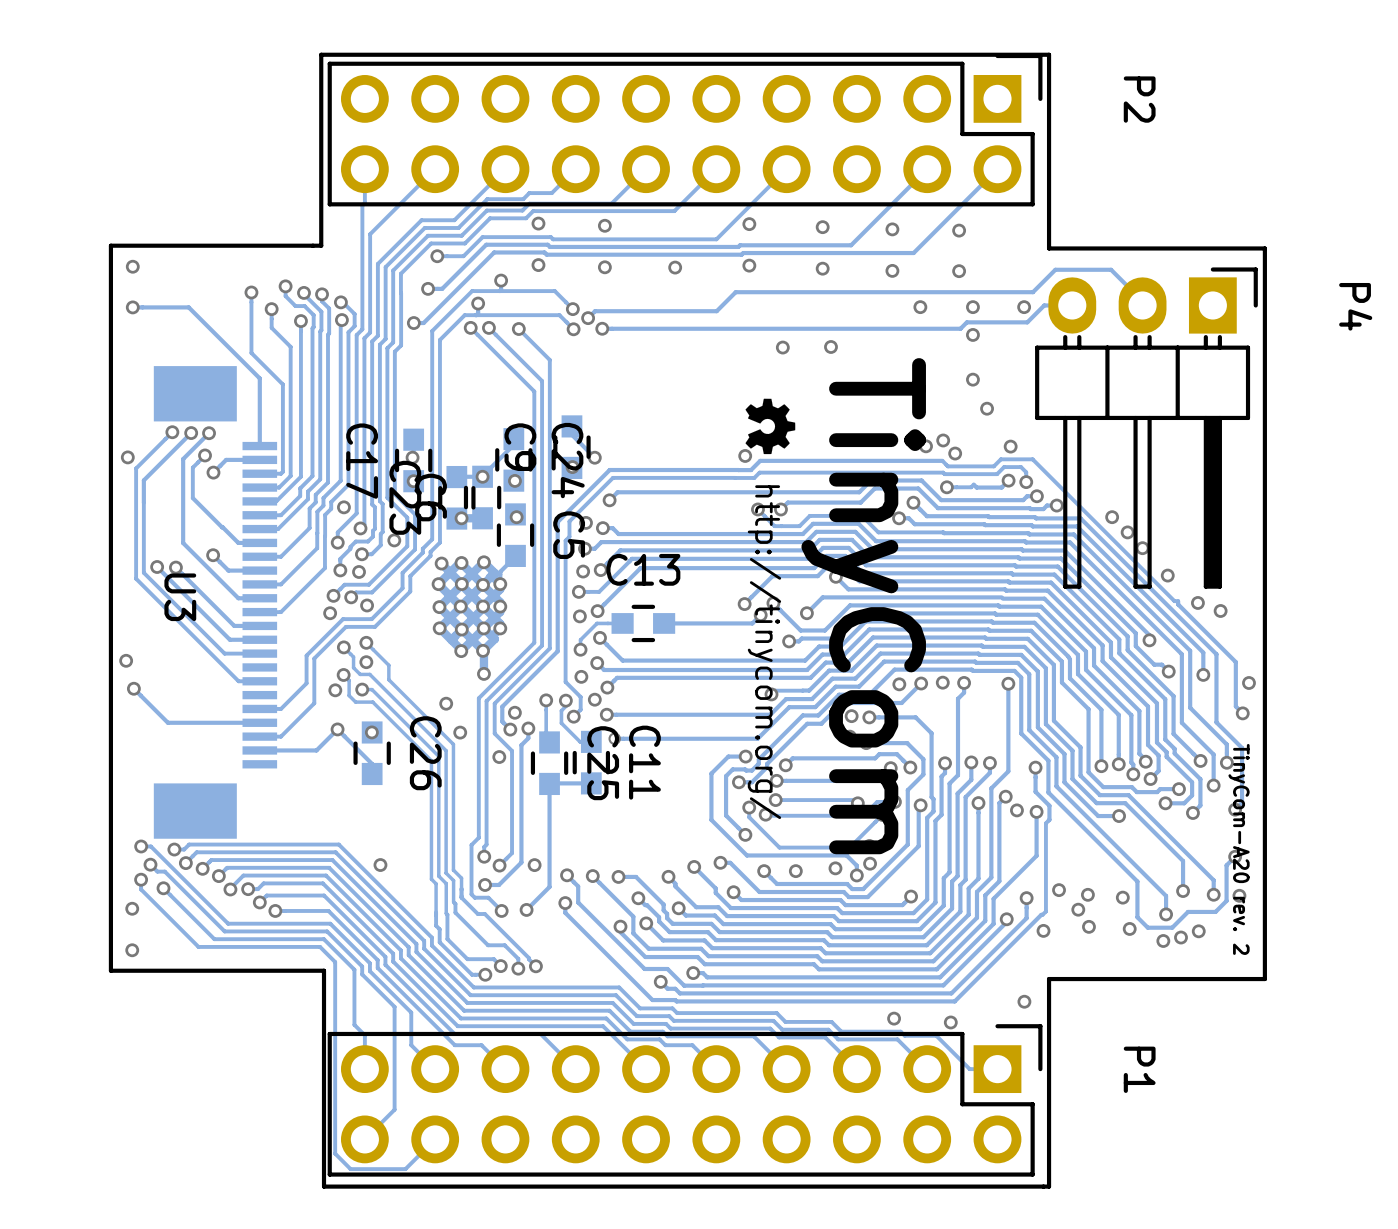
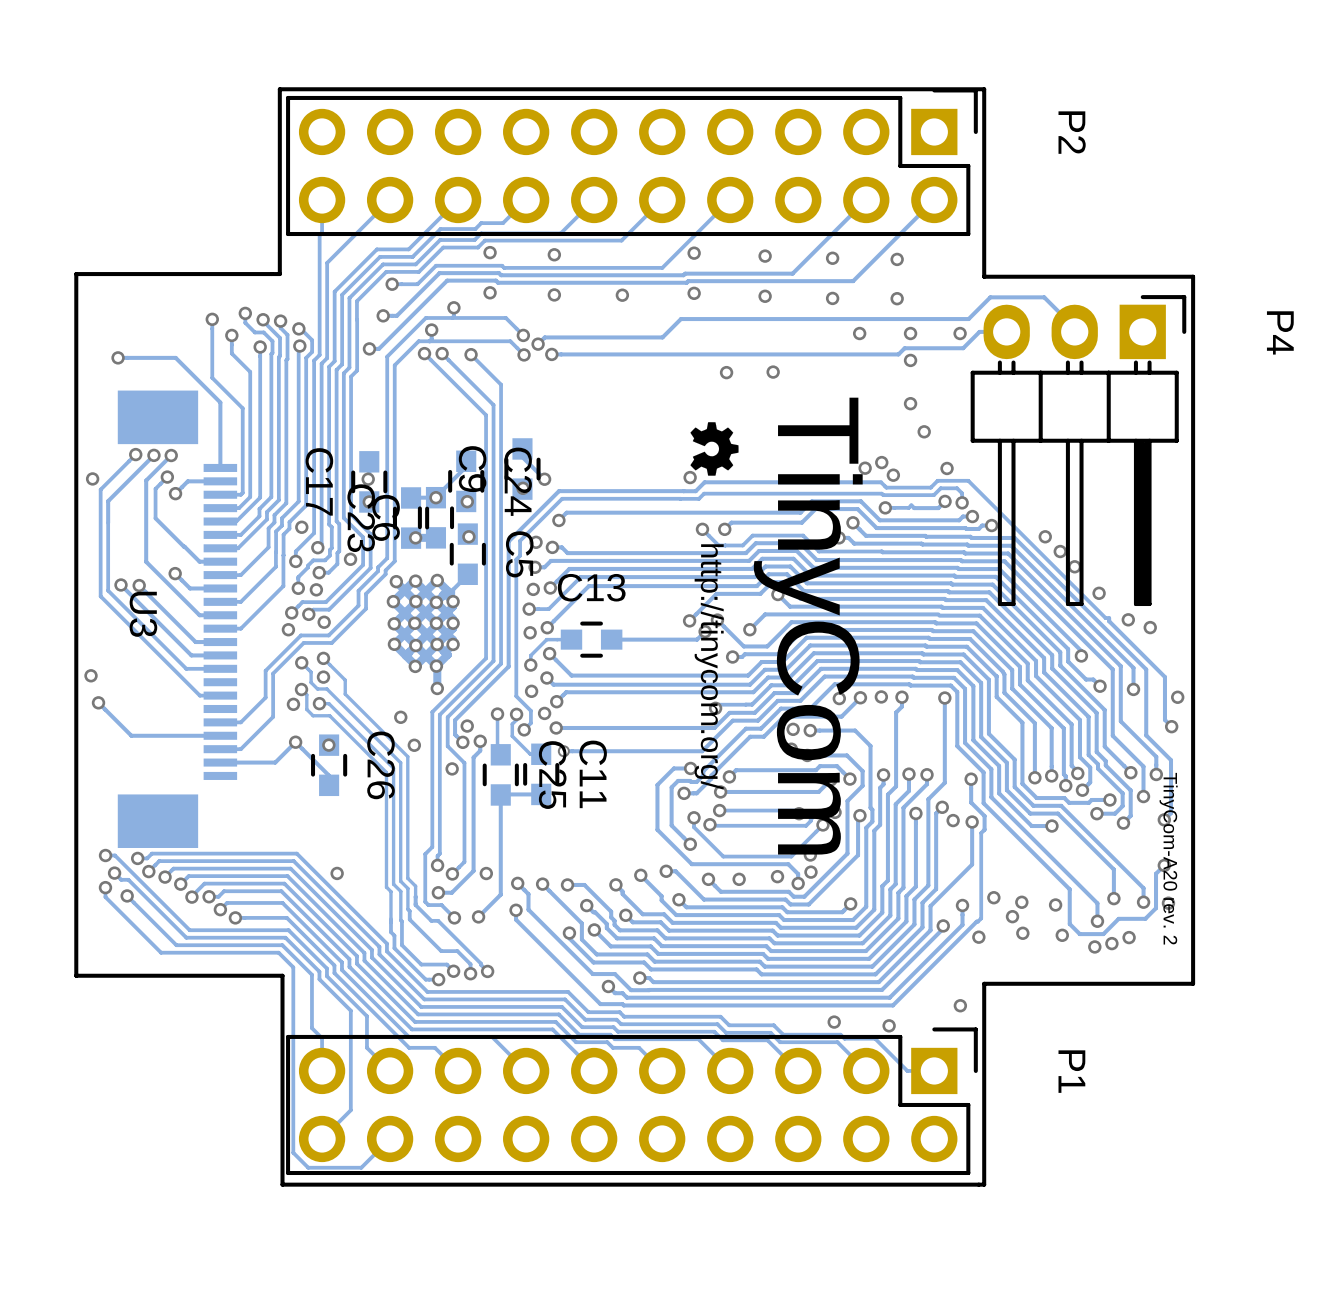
via: (132, 266) -> none
track: (132, 307) (188, 307) (213, 332) -> (118, 357) (175, 357)
via position: (132, 307) -> (118, 357)
via: (132, 908) -> none
via: (132, 950) -> none

